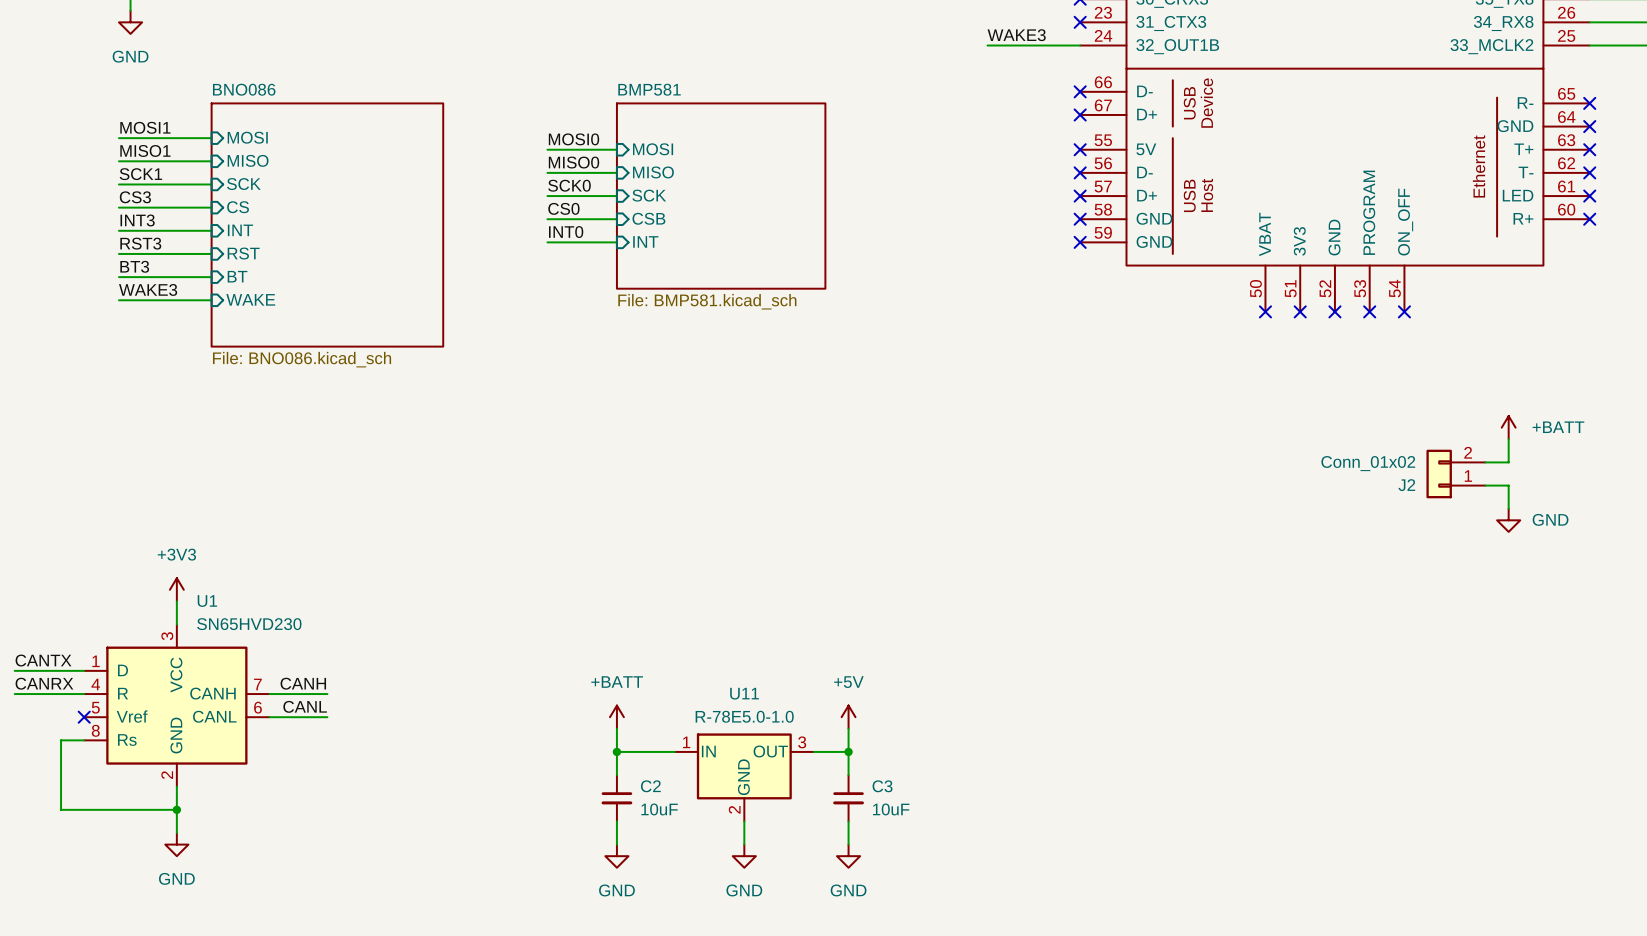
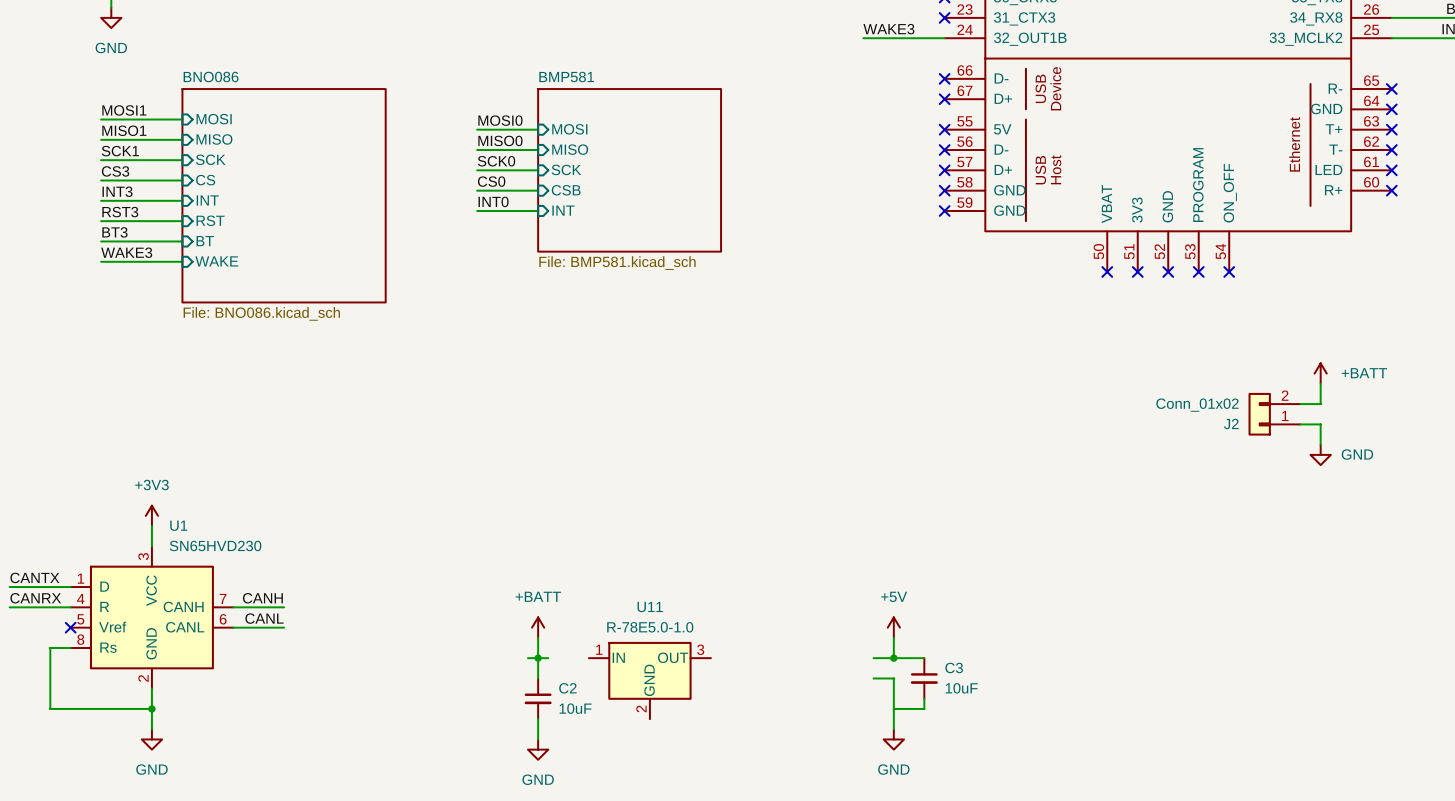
power symbol position: +5V (848, 717) -> +5V (893, 627)
wire: (848, 728) (848, 775) -> none
wire: none -> (527, 658) (538, 658)
wire: (628, 751) (674, 751) -> none
wire: (813, 751) (848, 751) -> none
junction: (848, 751) -> none
wire: none -> (873, 658) (924, 658)
junction: none -> (893, 658)
wire: none -> (873, 678) (893, 678) (893, 729)
C3 position: (848, 798) -> (924, 678)
wire: none -> (924, 698) (924, 708) (893, 708)
wire: (744, 821) (744, 844) -> none
wire: (848, 821) (848, 844) -> (893, 637) (893, 658)
power symbol: none -> GND (893, 739)
power symbol: GND (744, 856) -> none
power symbol: GND (848, 856) -> none

